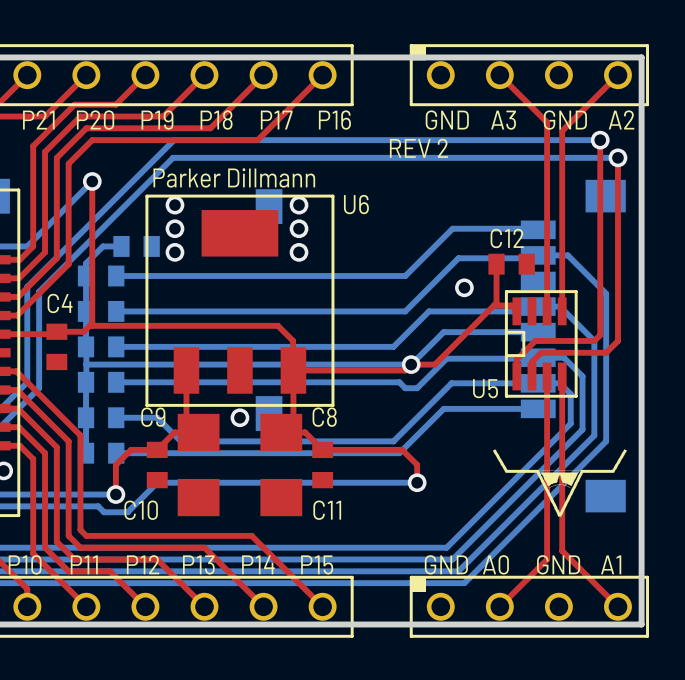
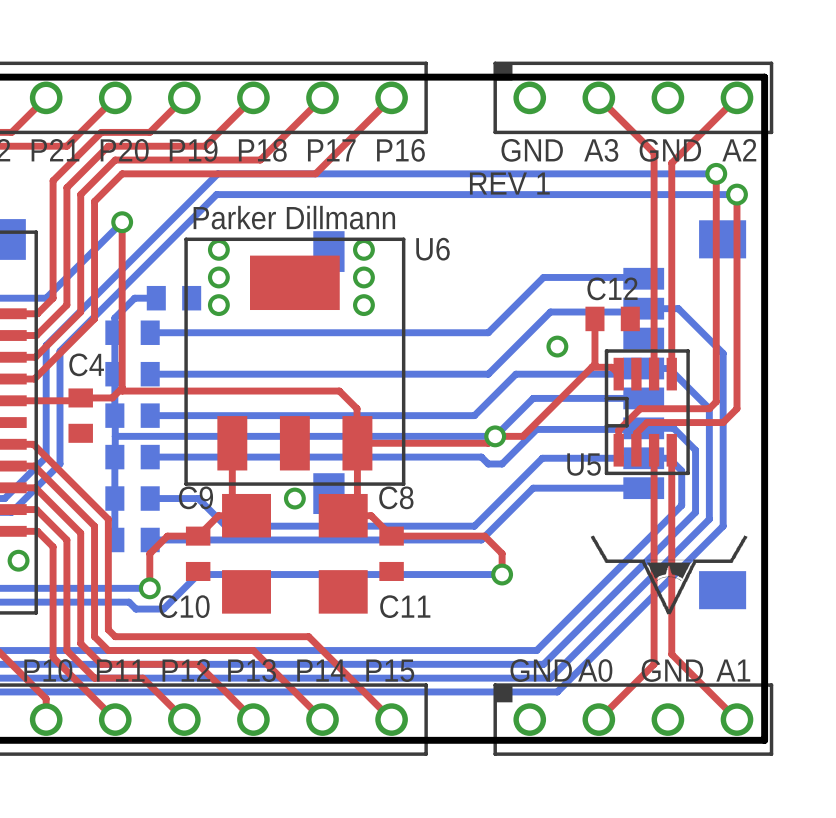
drawing shape: [153, 138, 448, 188] -> [193, 172, 550, 230]

